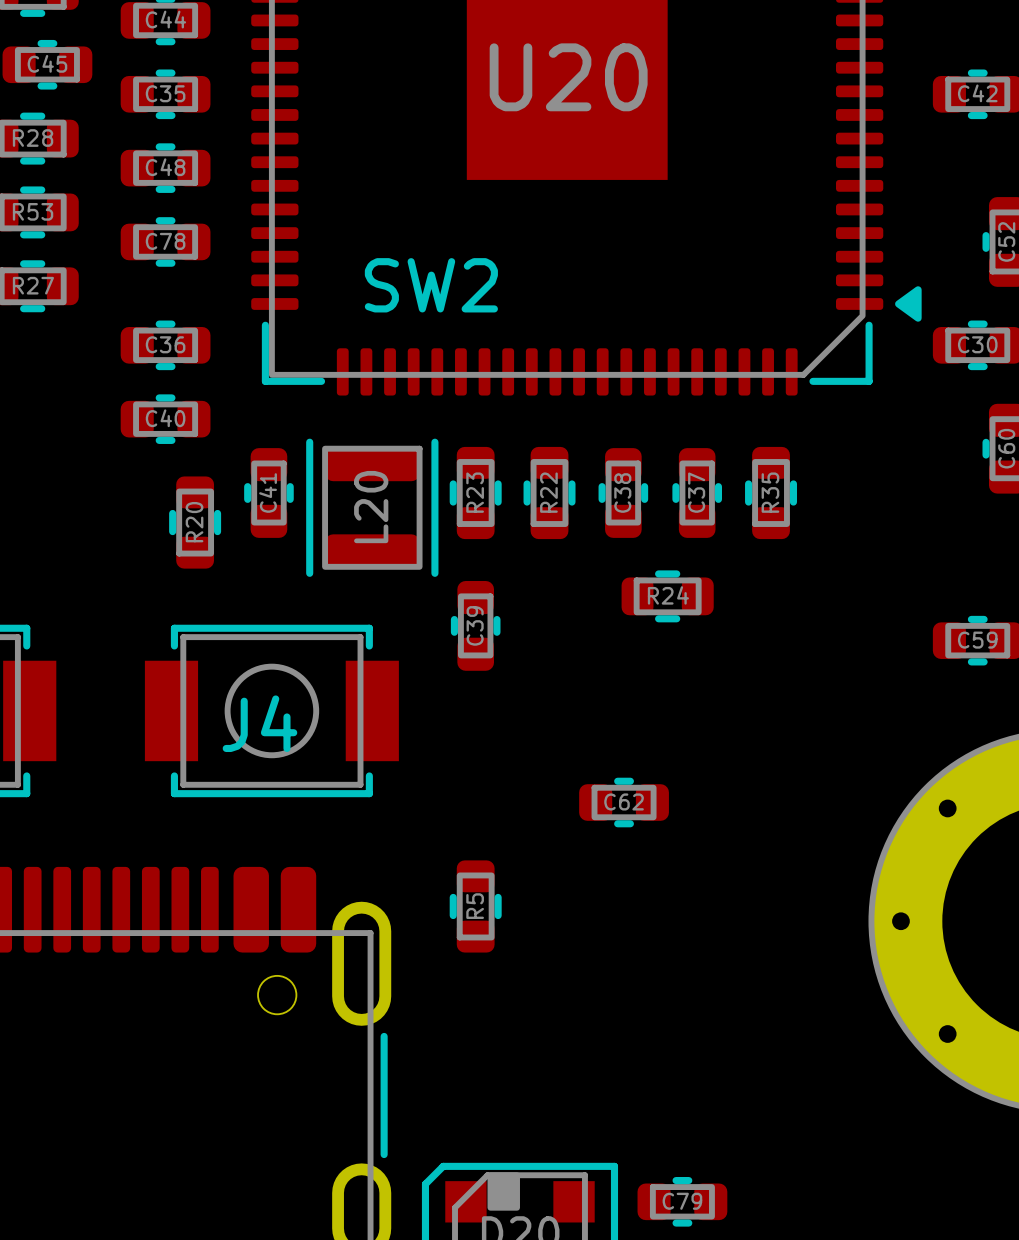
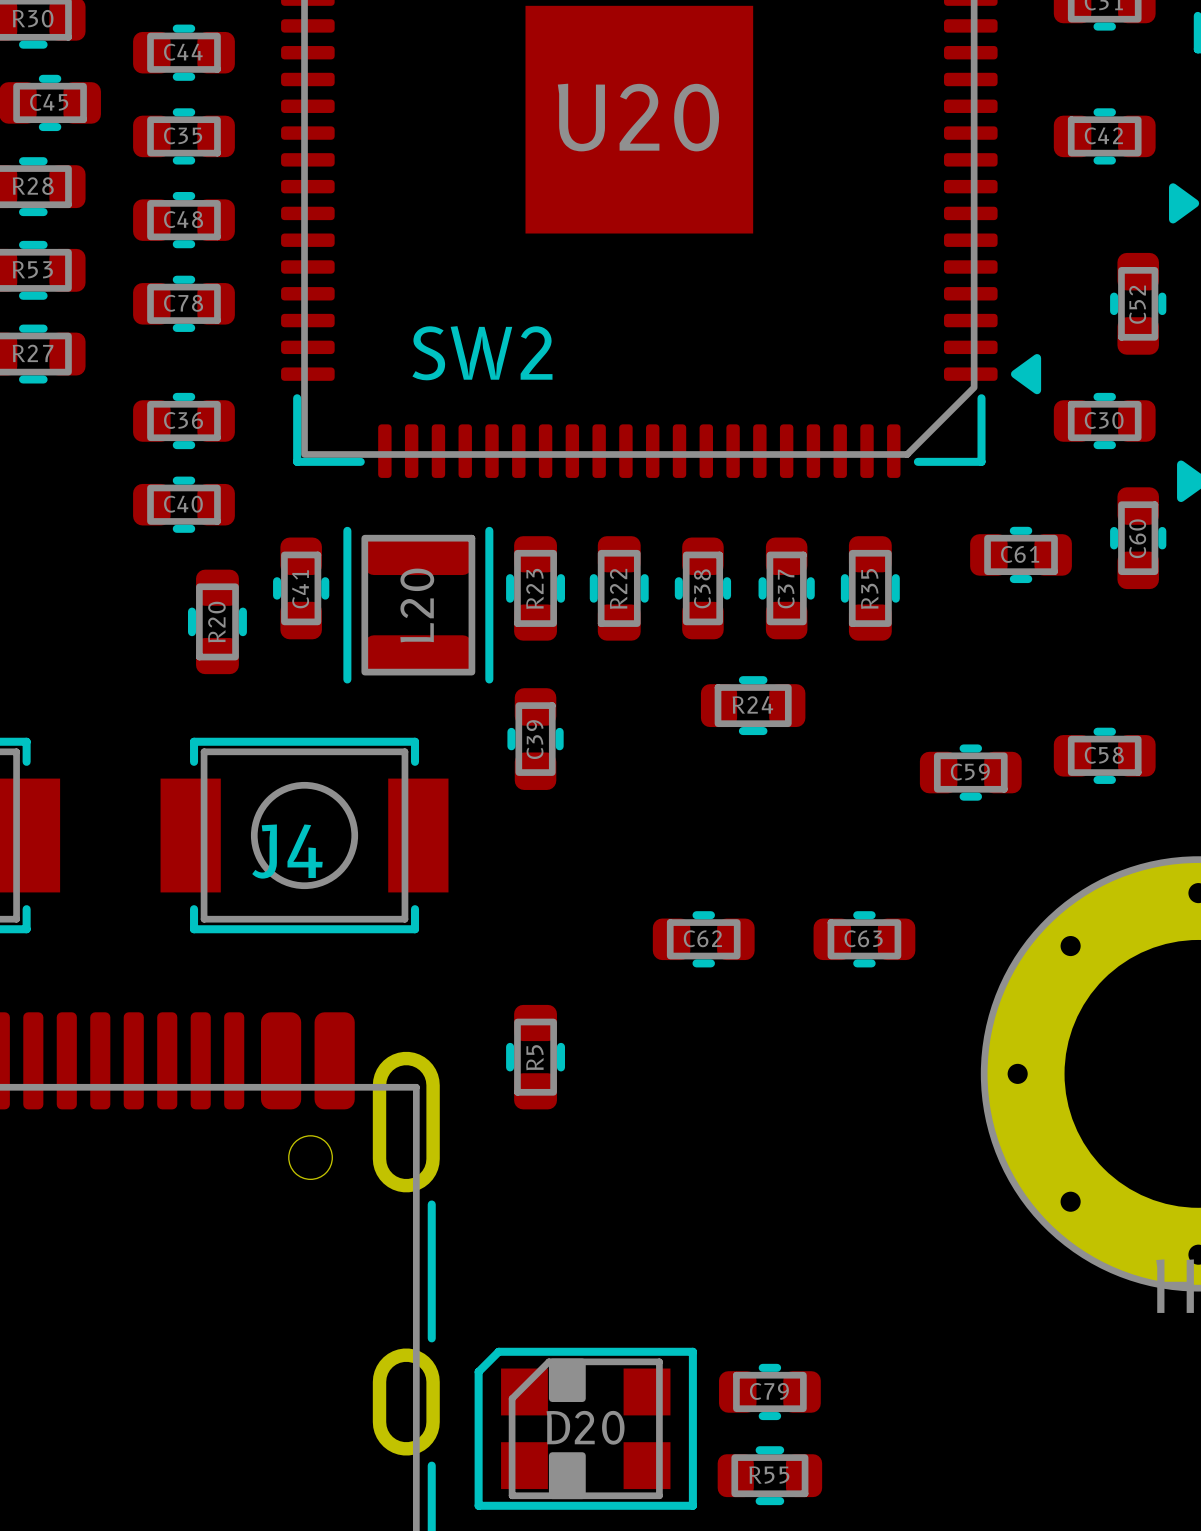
C61: none -> (1021, 554)
C59 name: C59 (977, 640) -> C58 (1104, 755)
C59: none -> (970, 772)
C63: none -> (864, 939)

